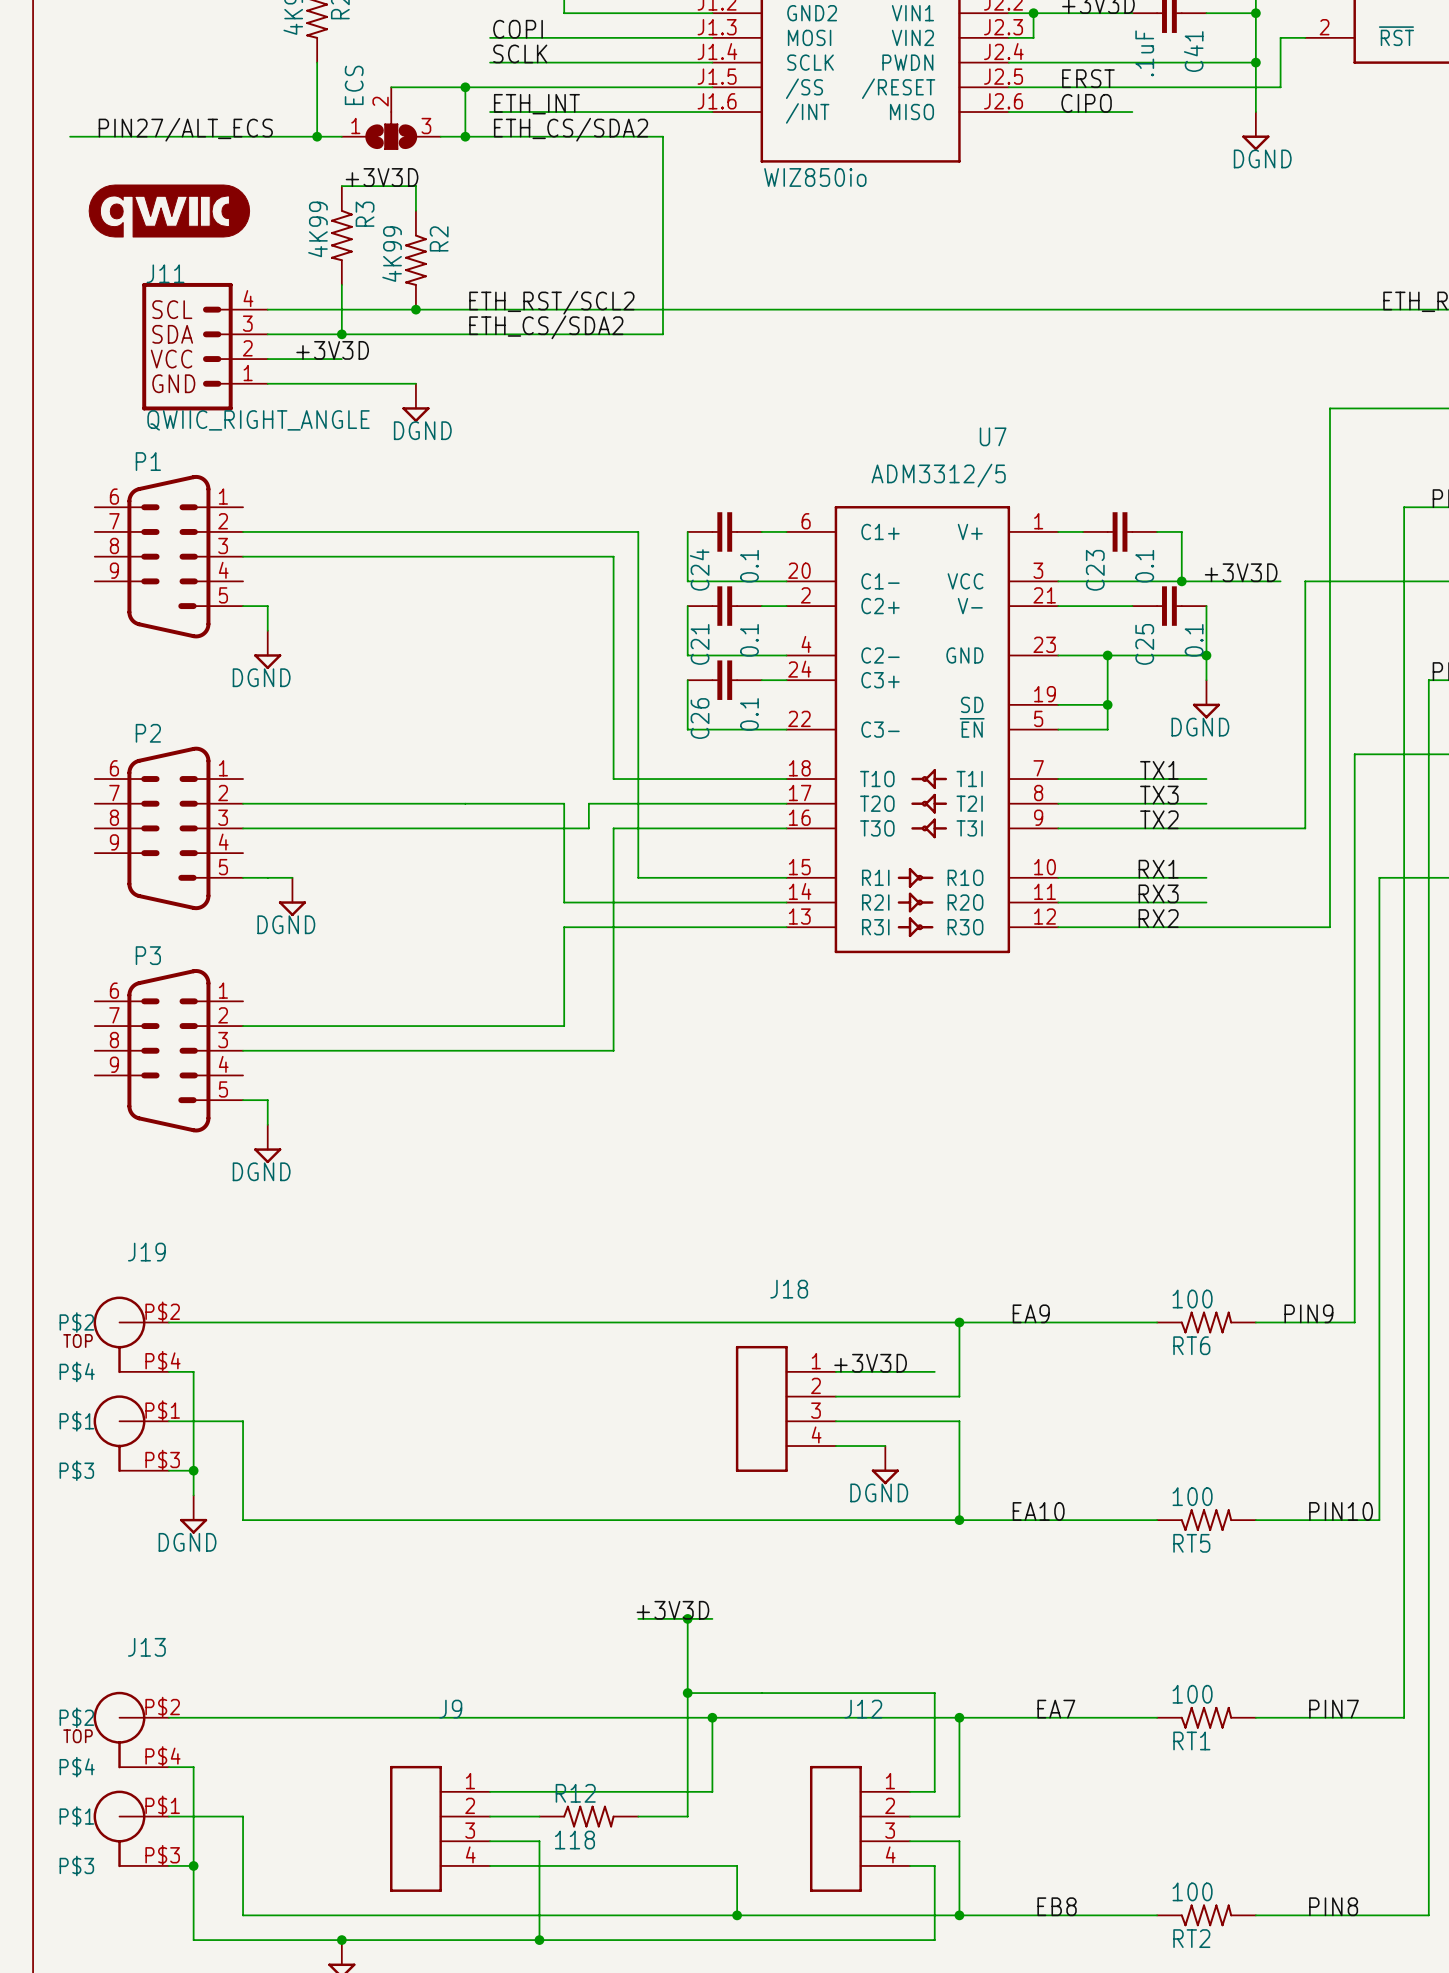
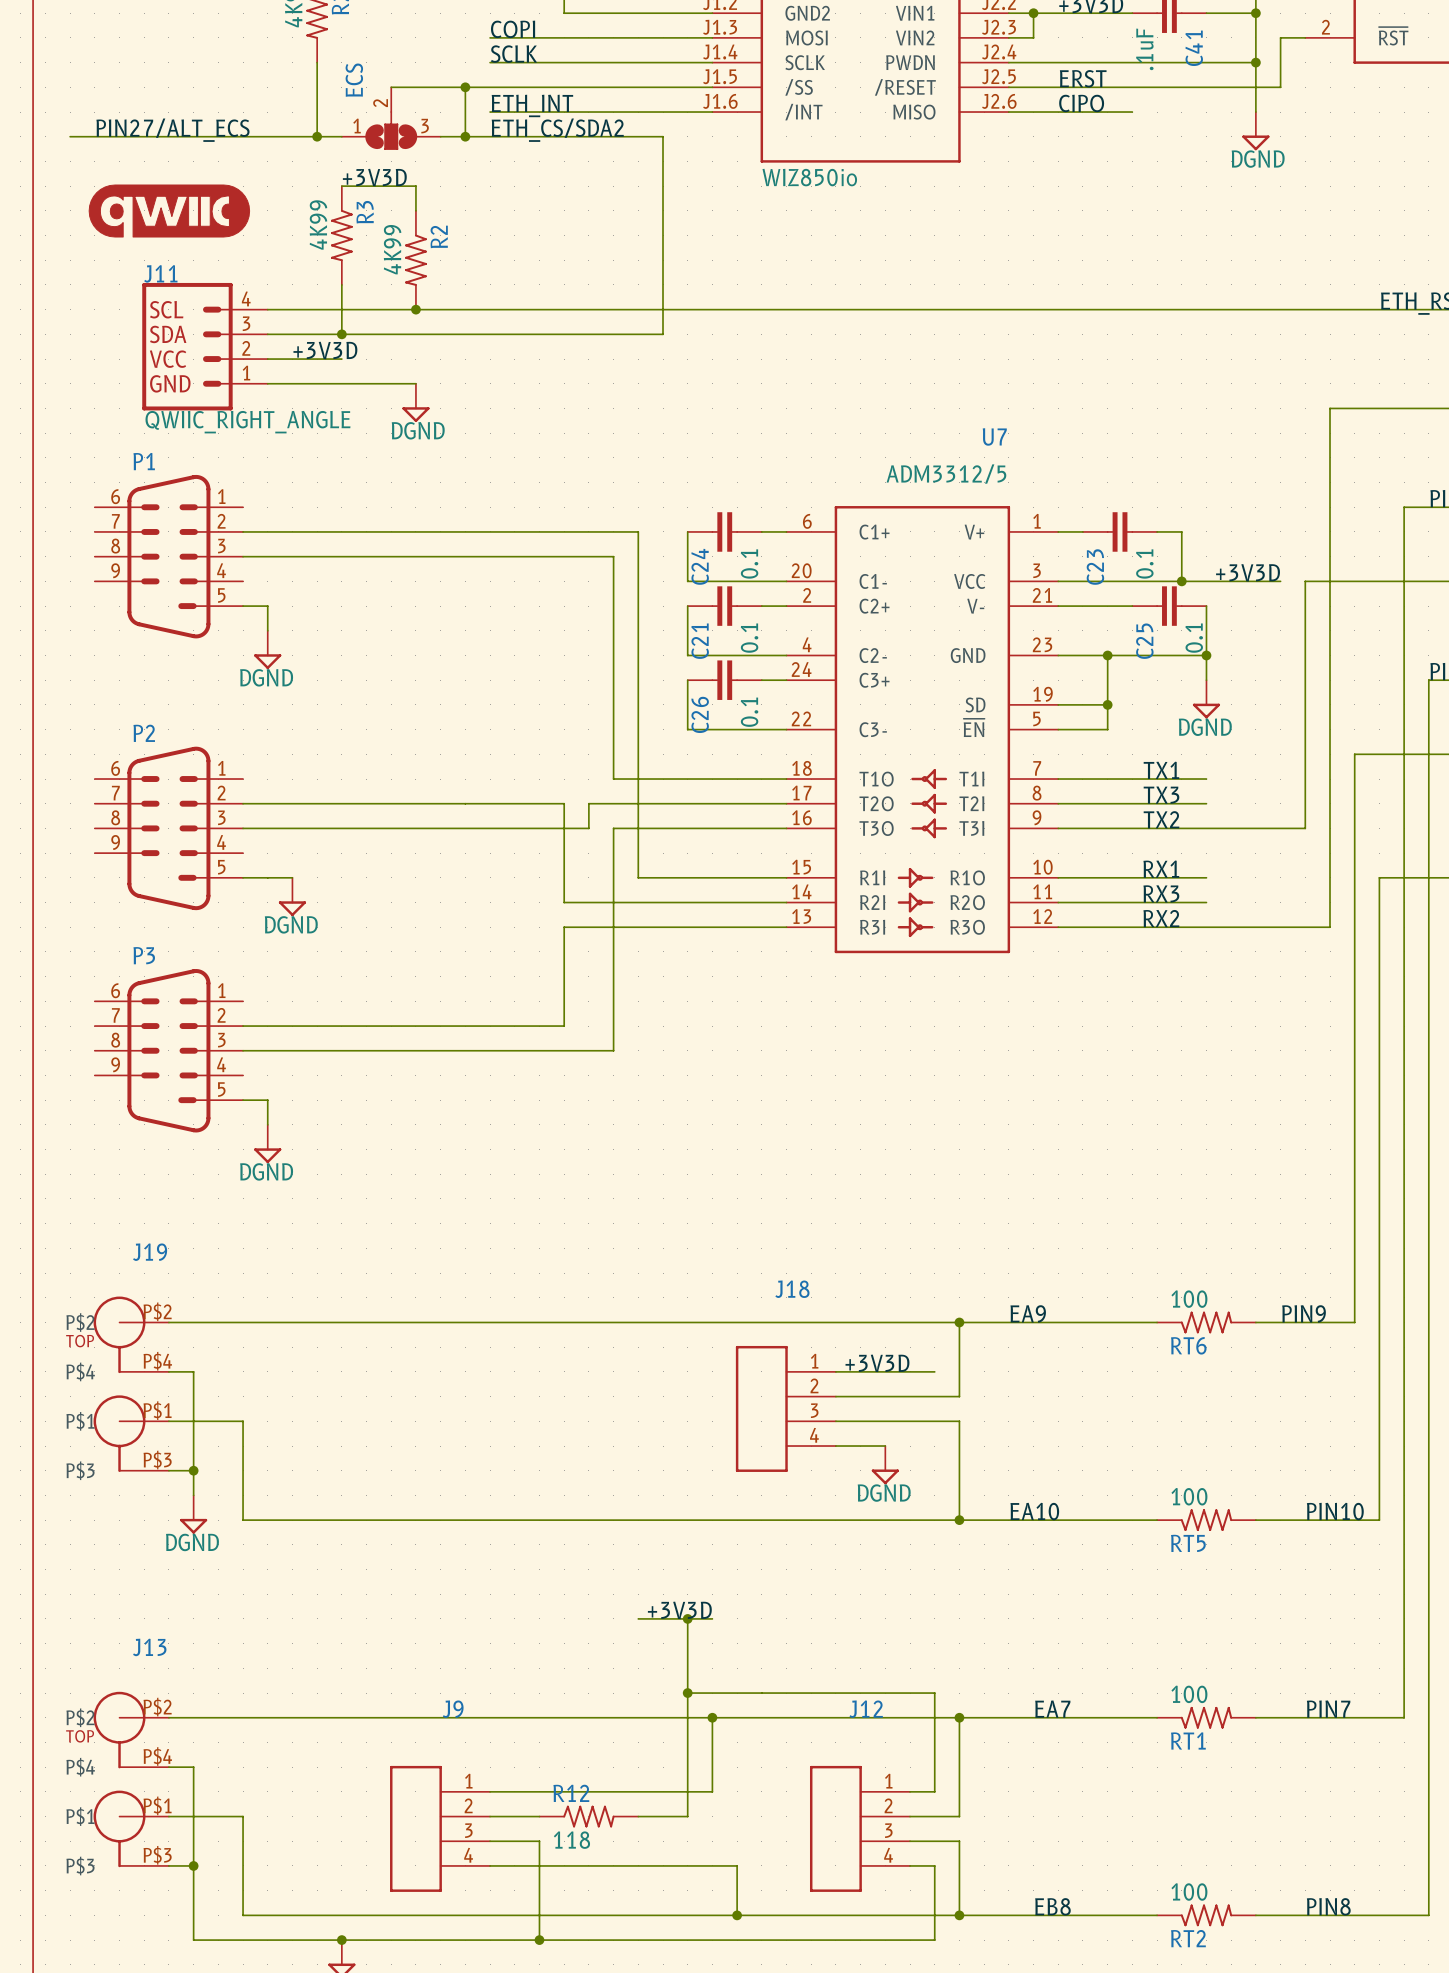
label: ETH_RST/SCL2 (551, 302) -> none
label: ETH_CS/SDA2 (546, 327) -> none

